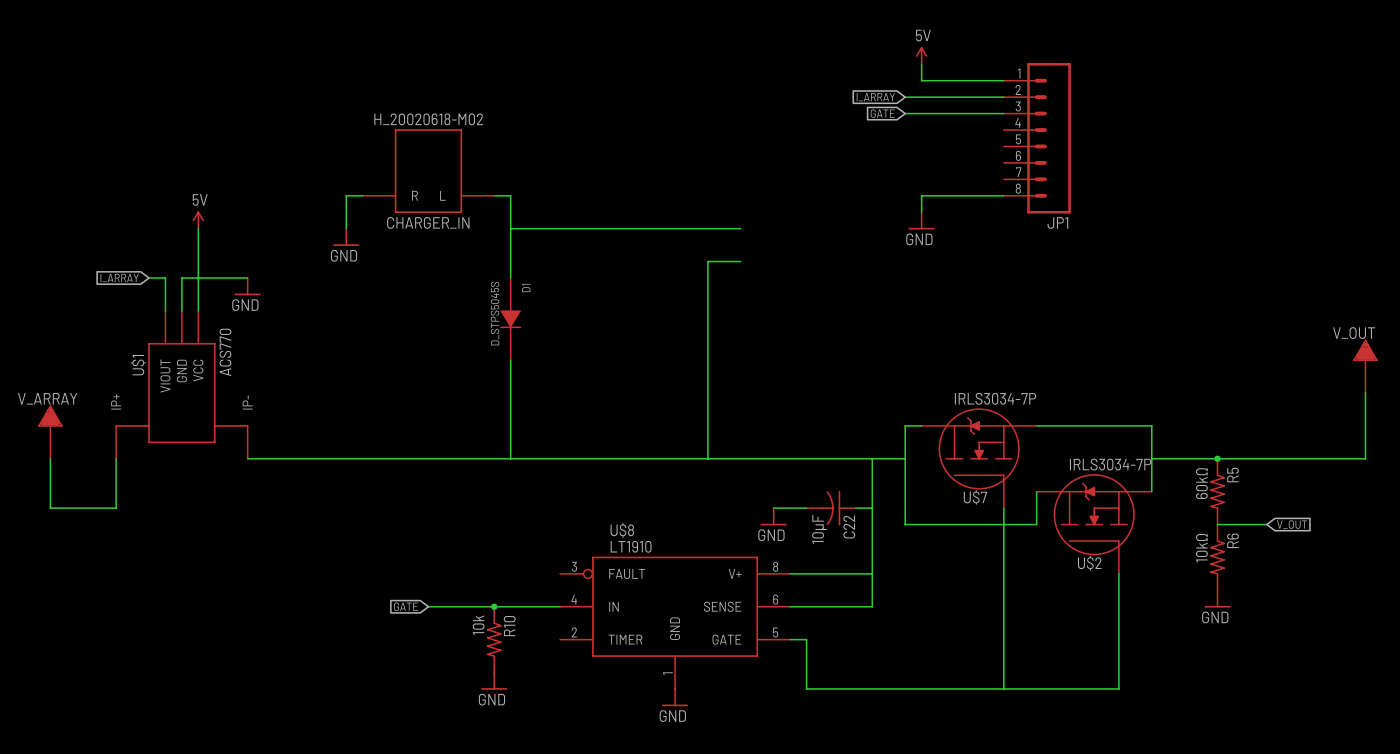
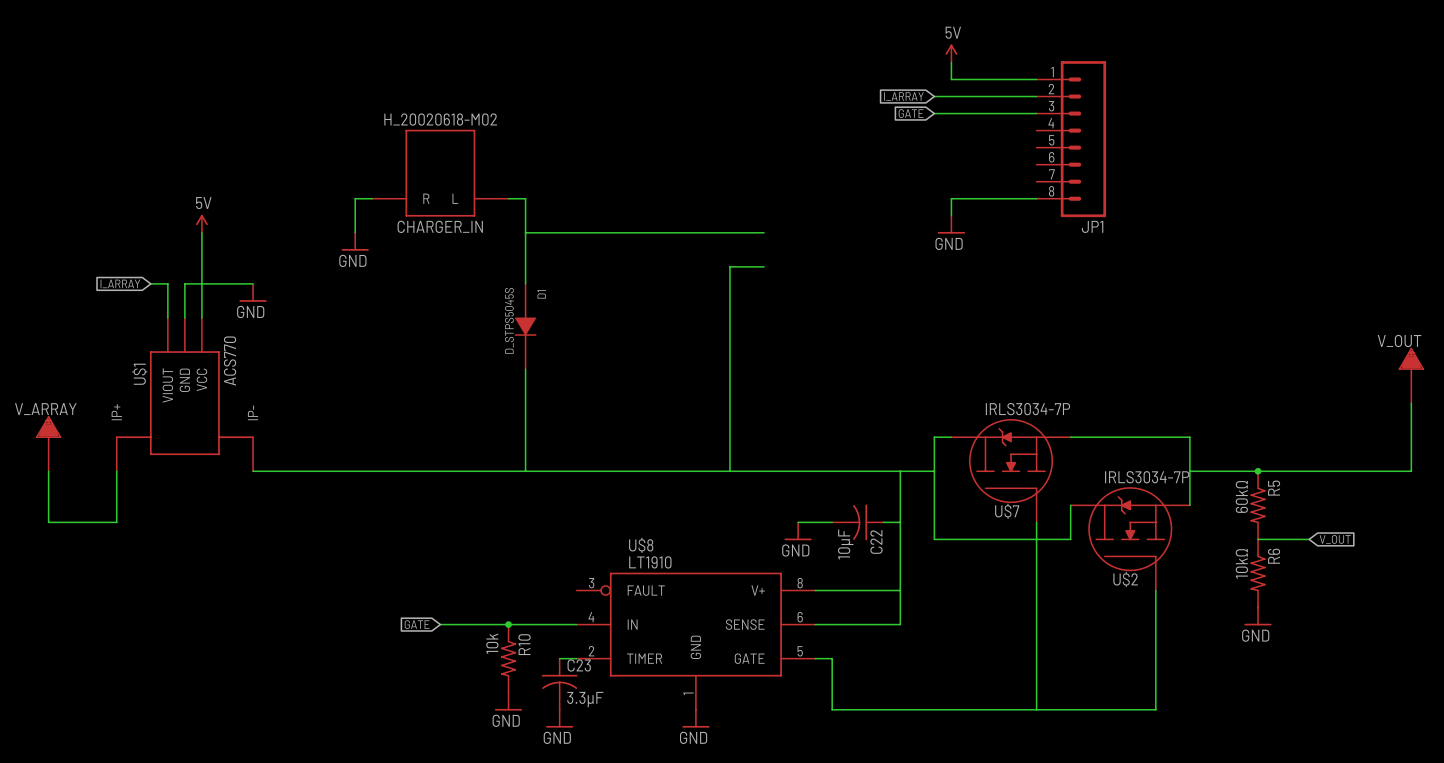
wire: none -> (559, 658) (576, 658)
C23: none -> 3.3µF (559, 684)
power symbol: none -> GND (559, 718)

